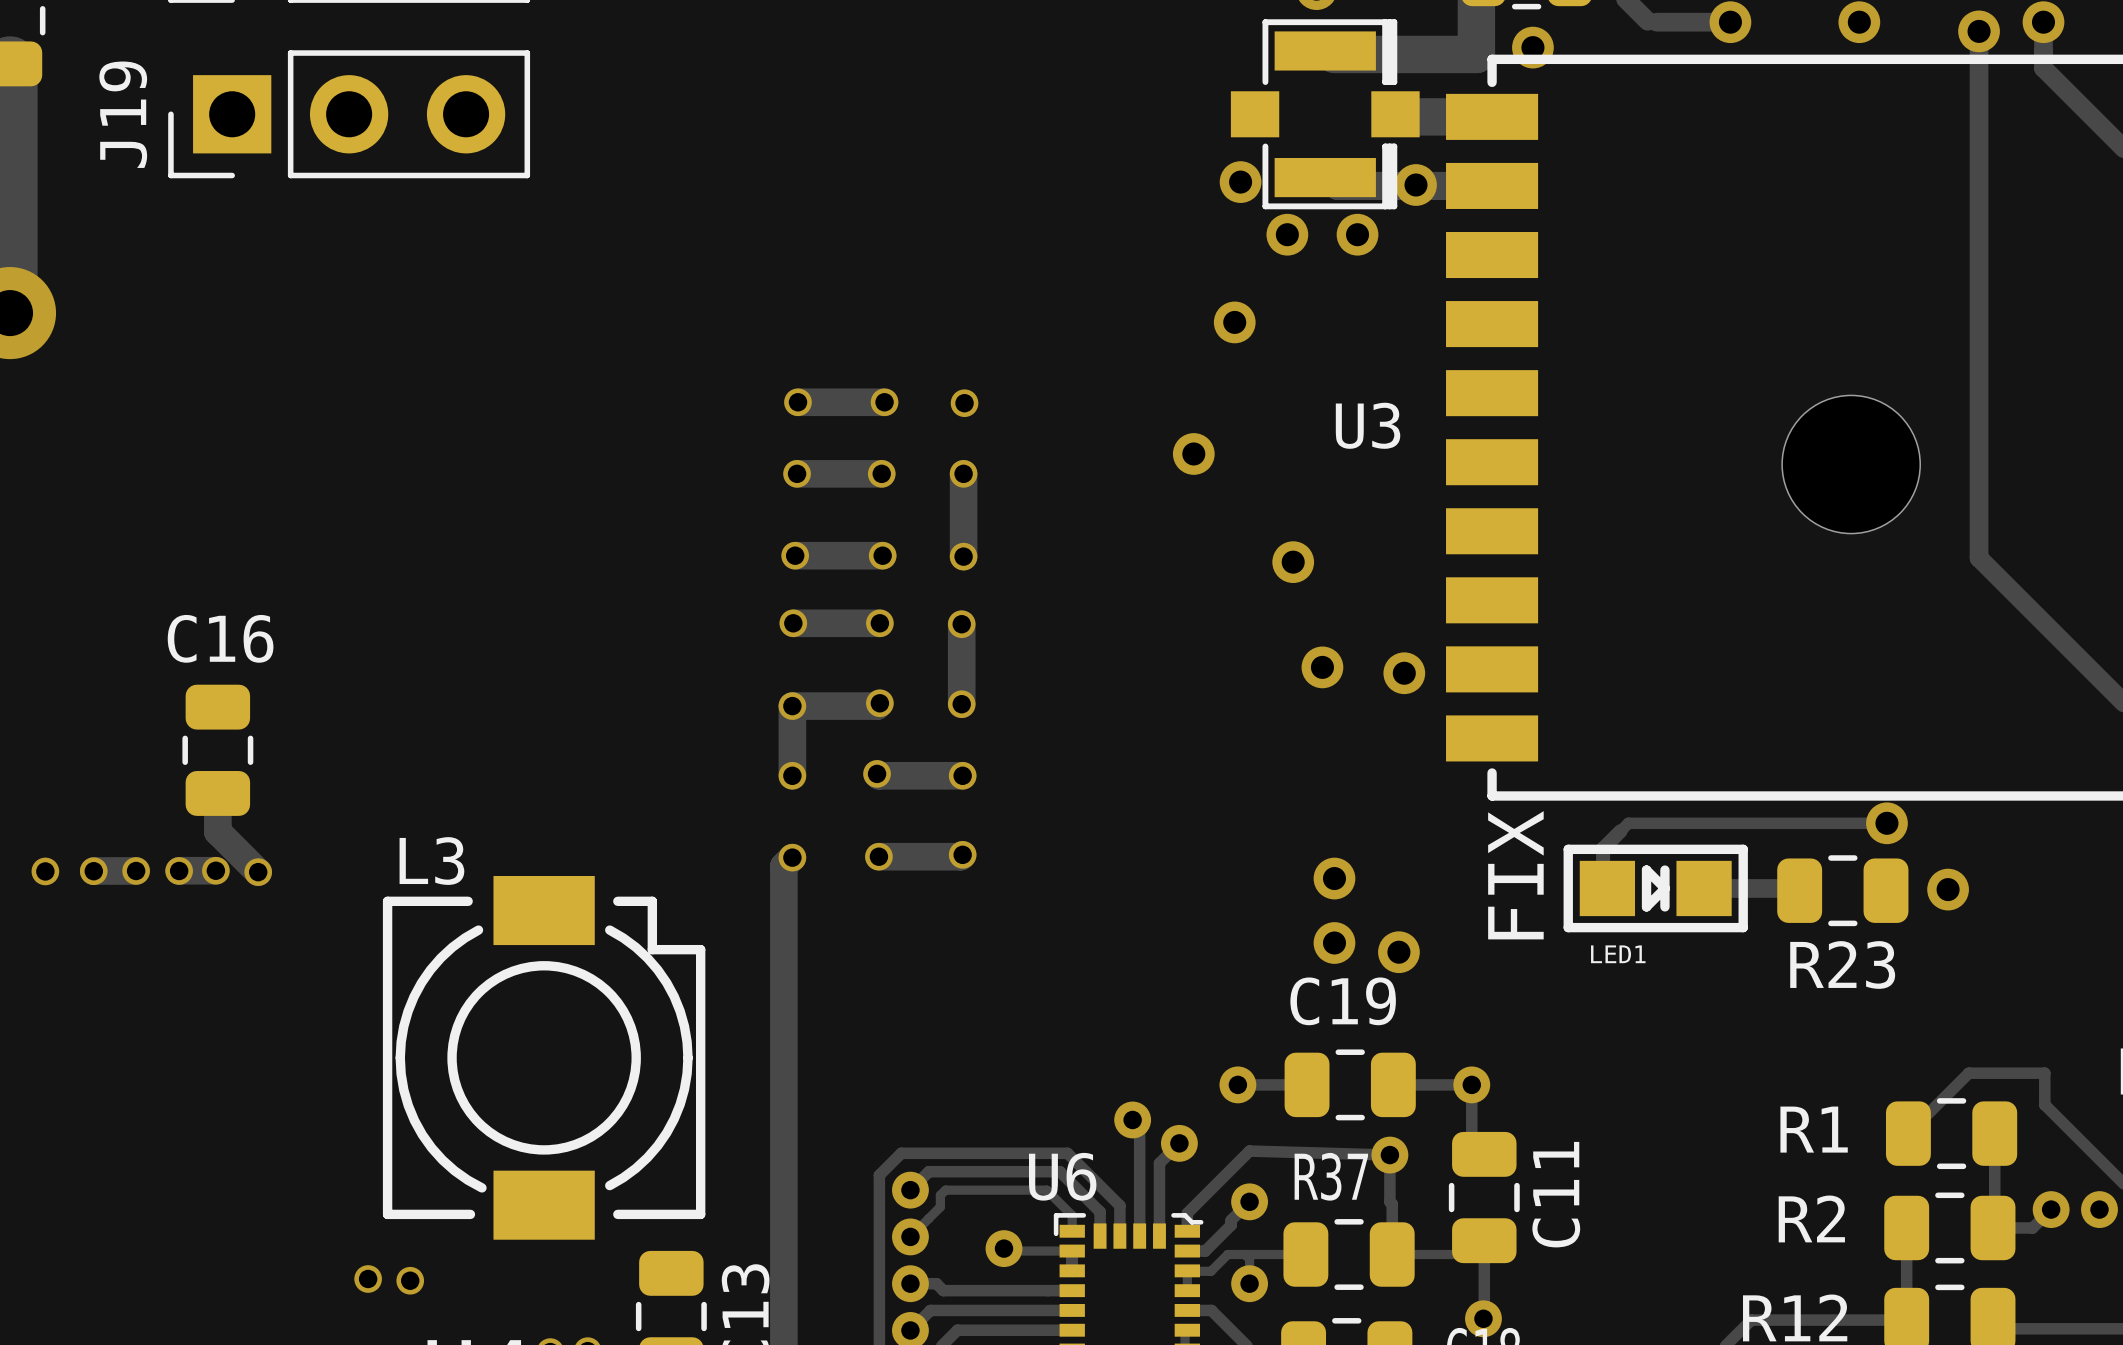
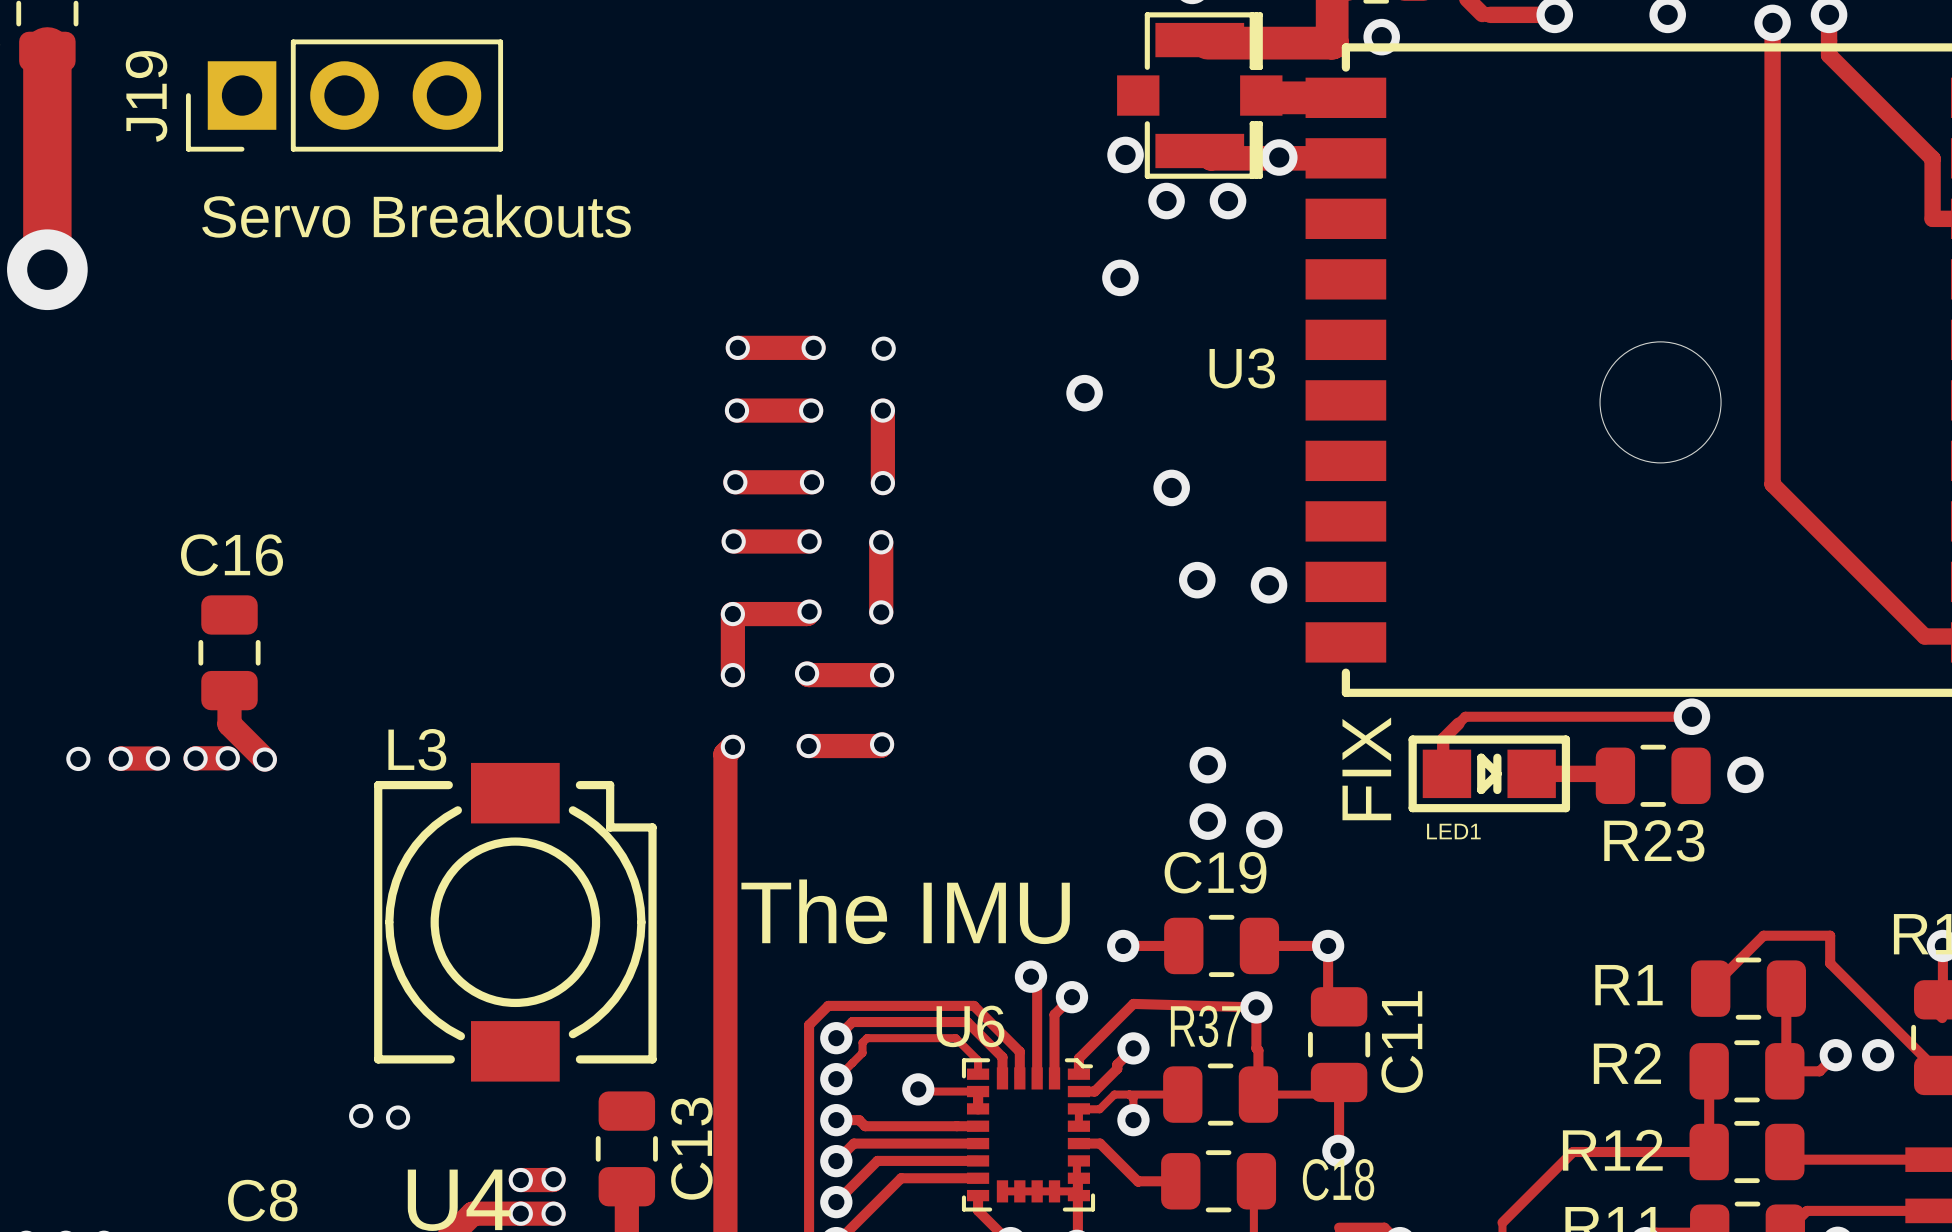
text: none -> Servo Breakouts (416, 216)
text: none -> The IMU (905, 911)

